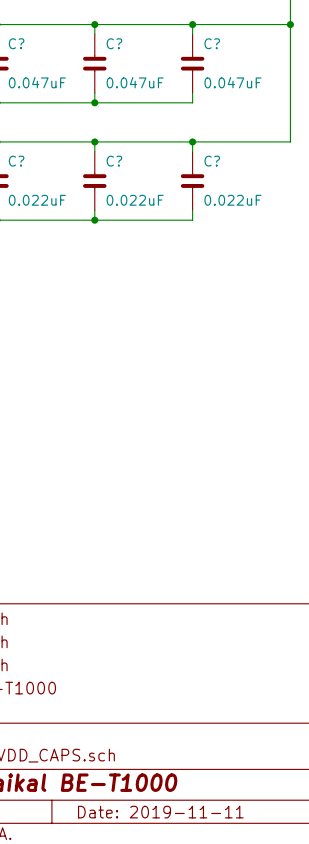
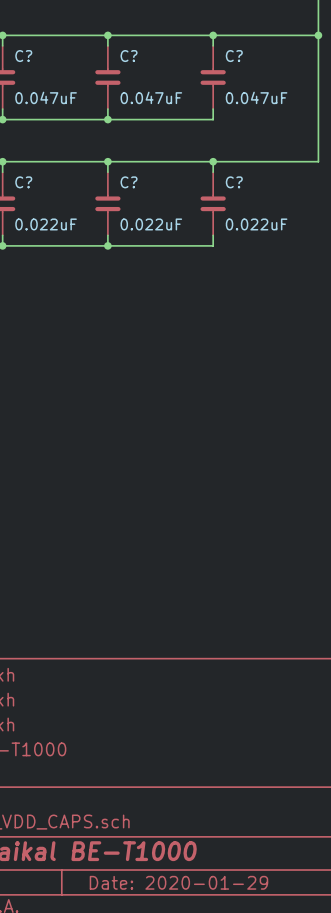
title block: Date: 2019-11-11 (160, 812) -> Date: 2020-01-29 (178, 882)

